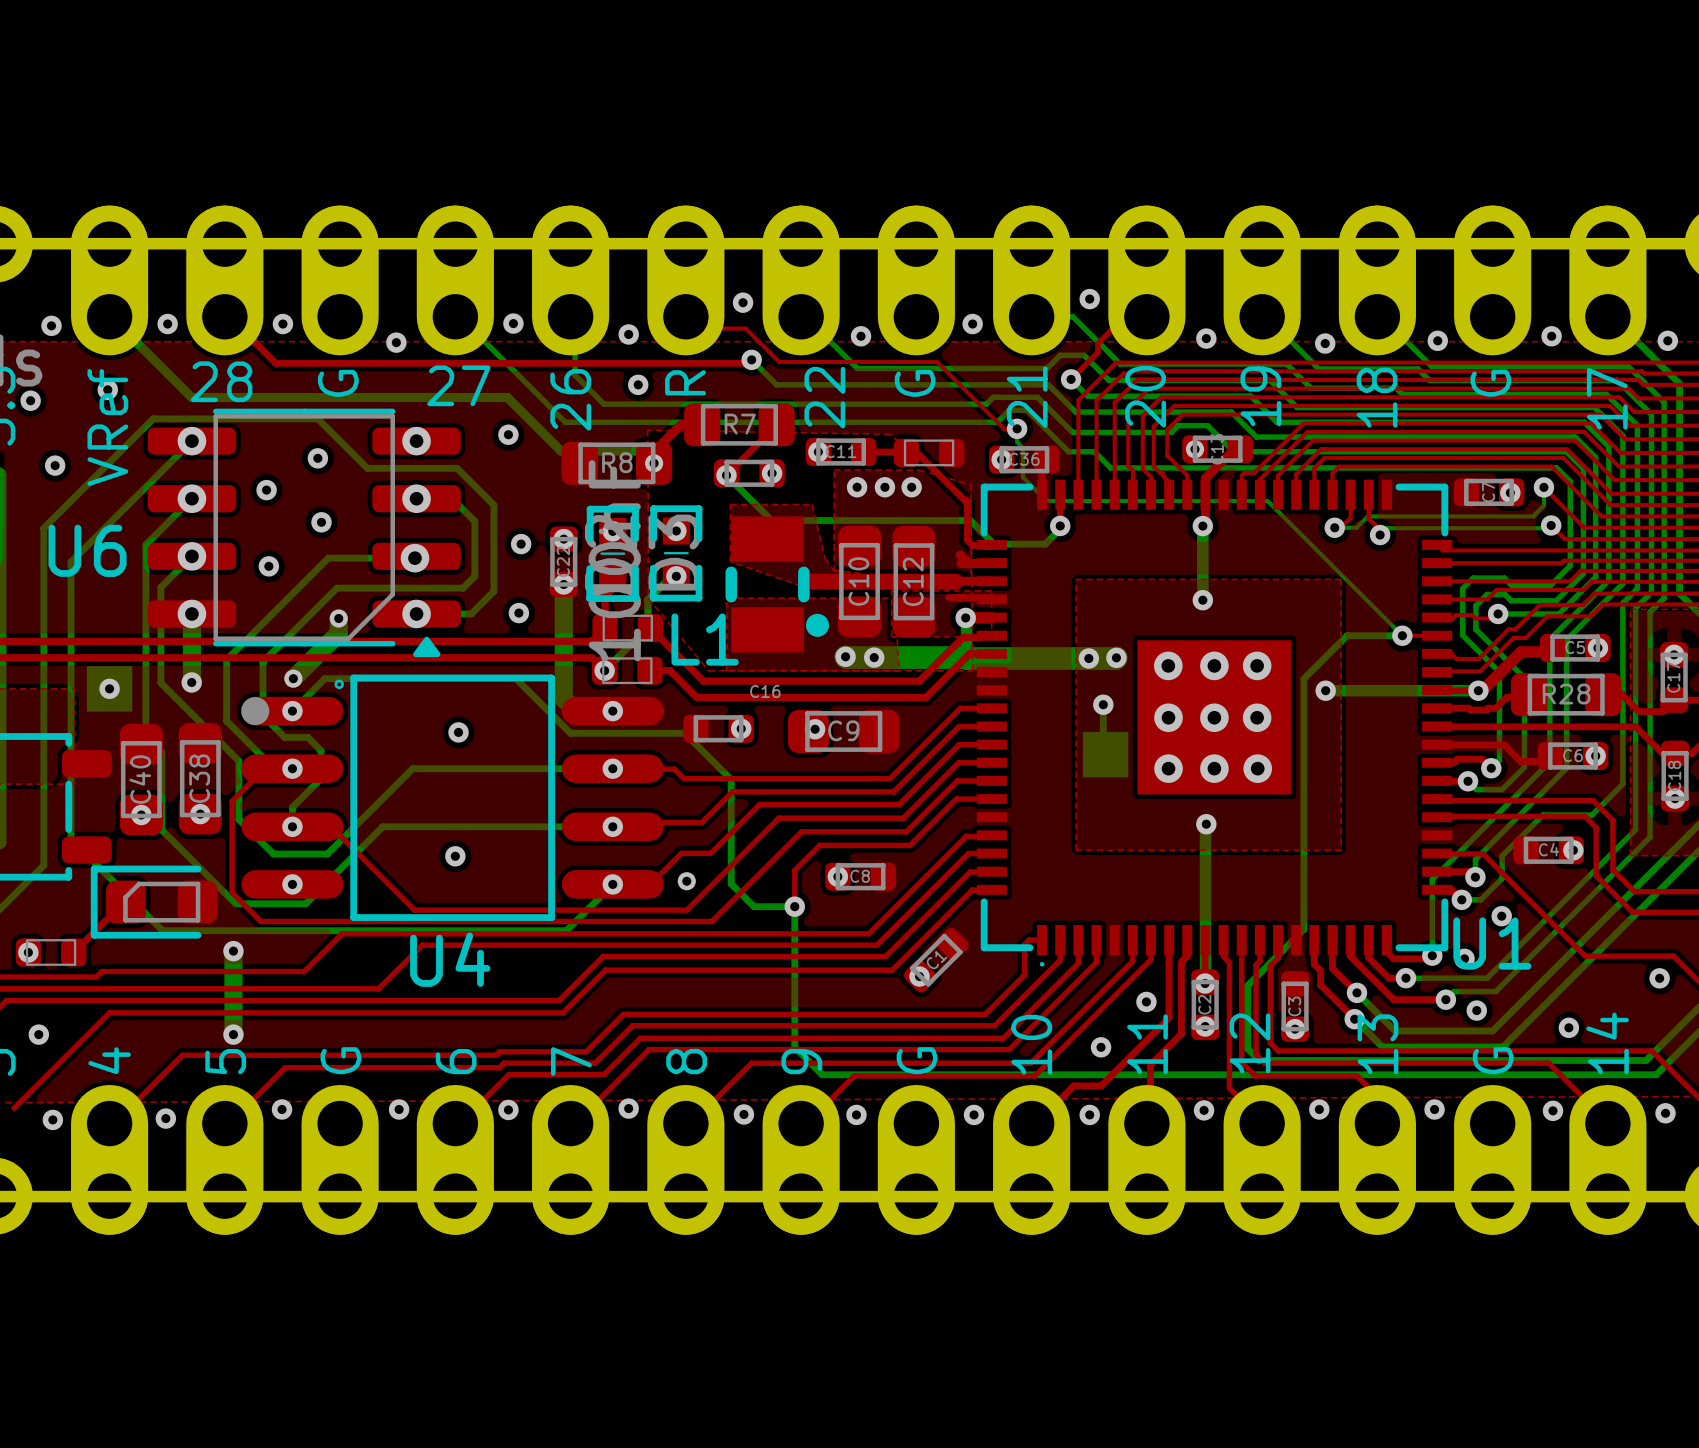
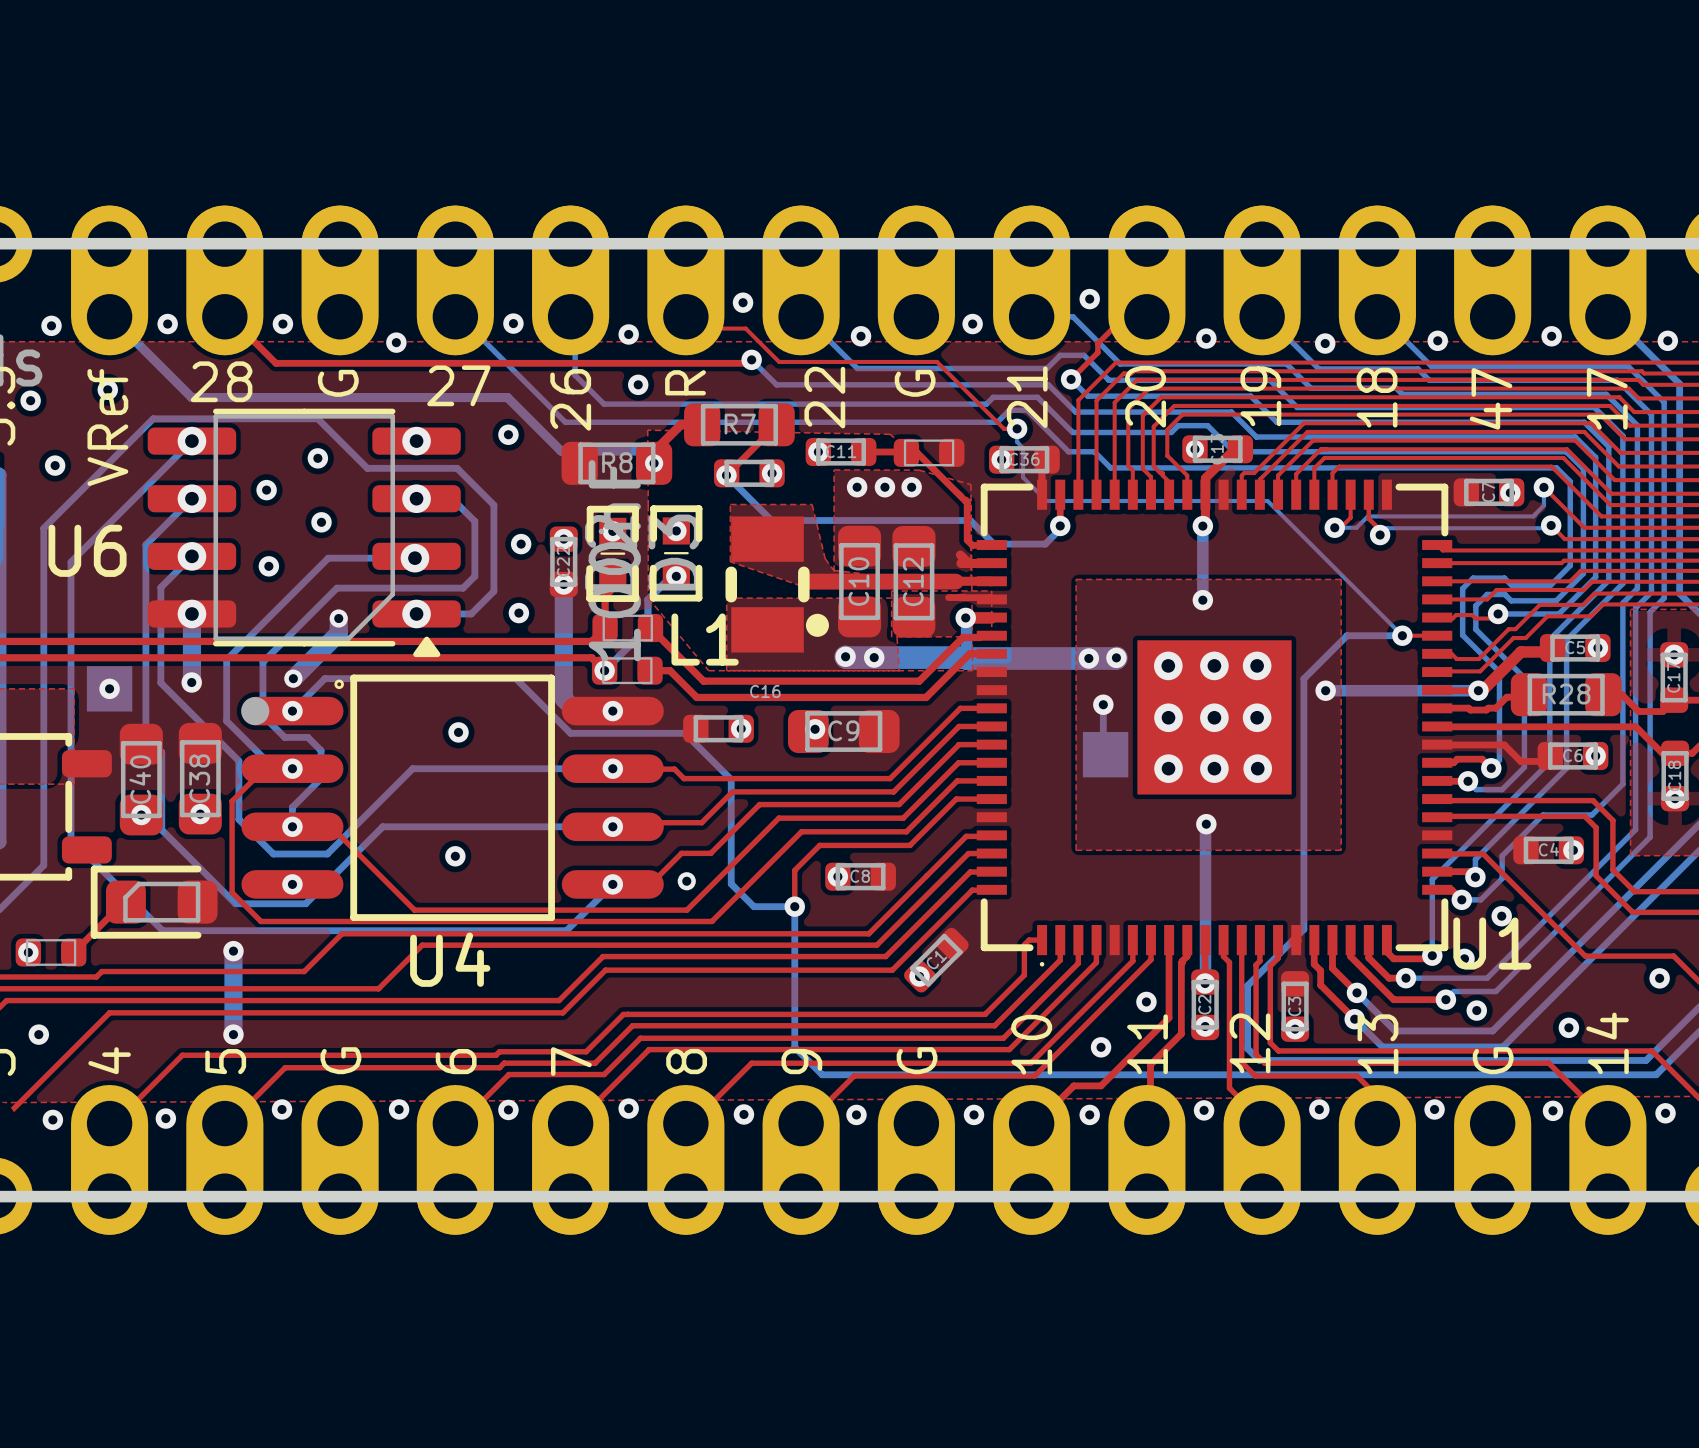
text: G (1490, 383) -> 47 (1491, 398)

